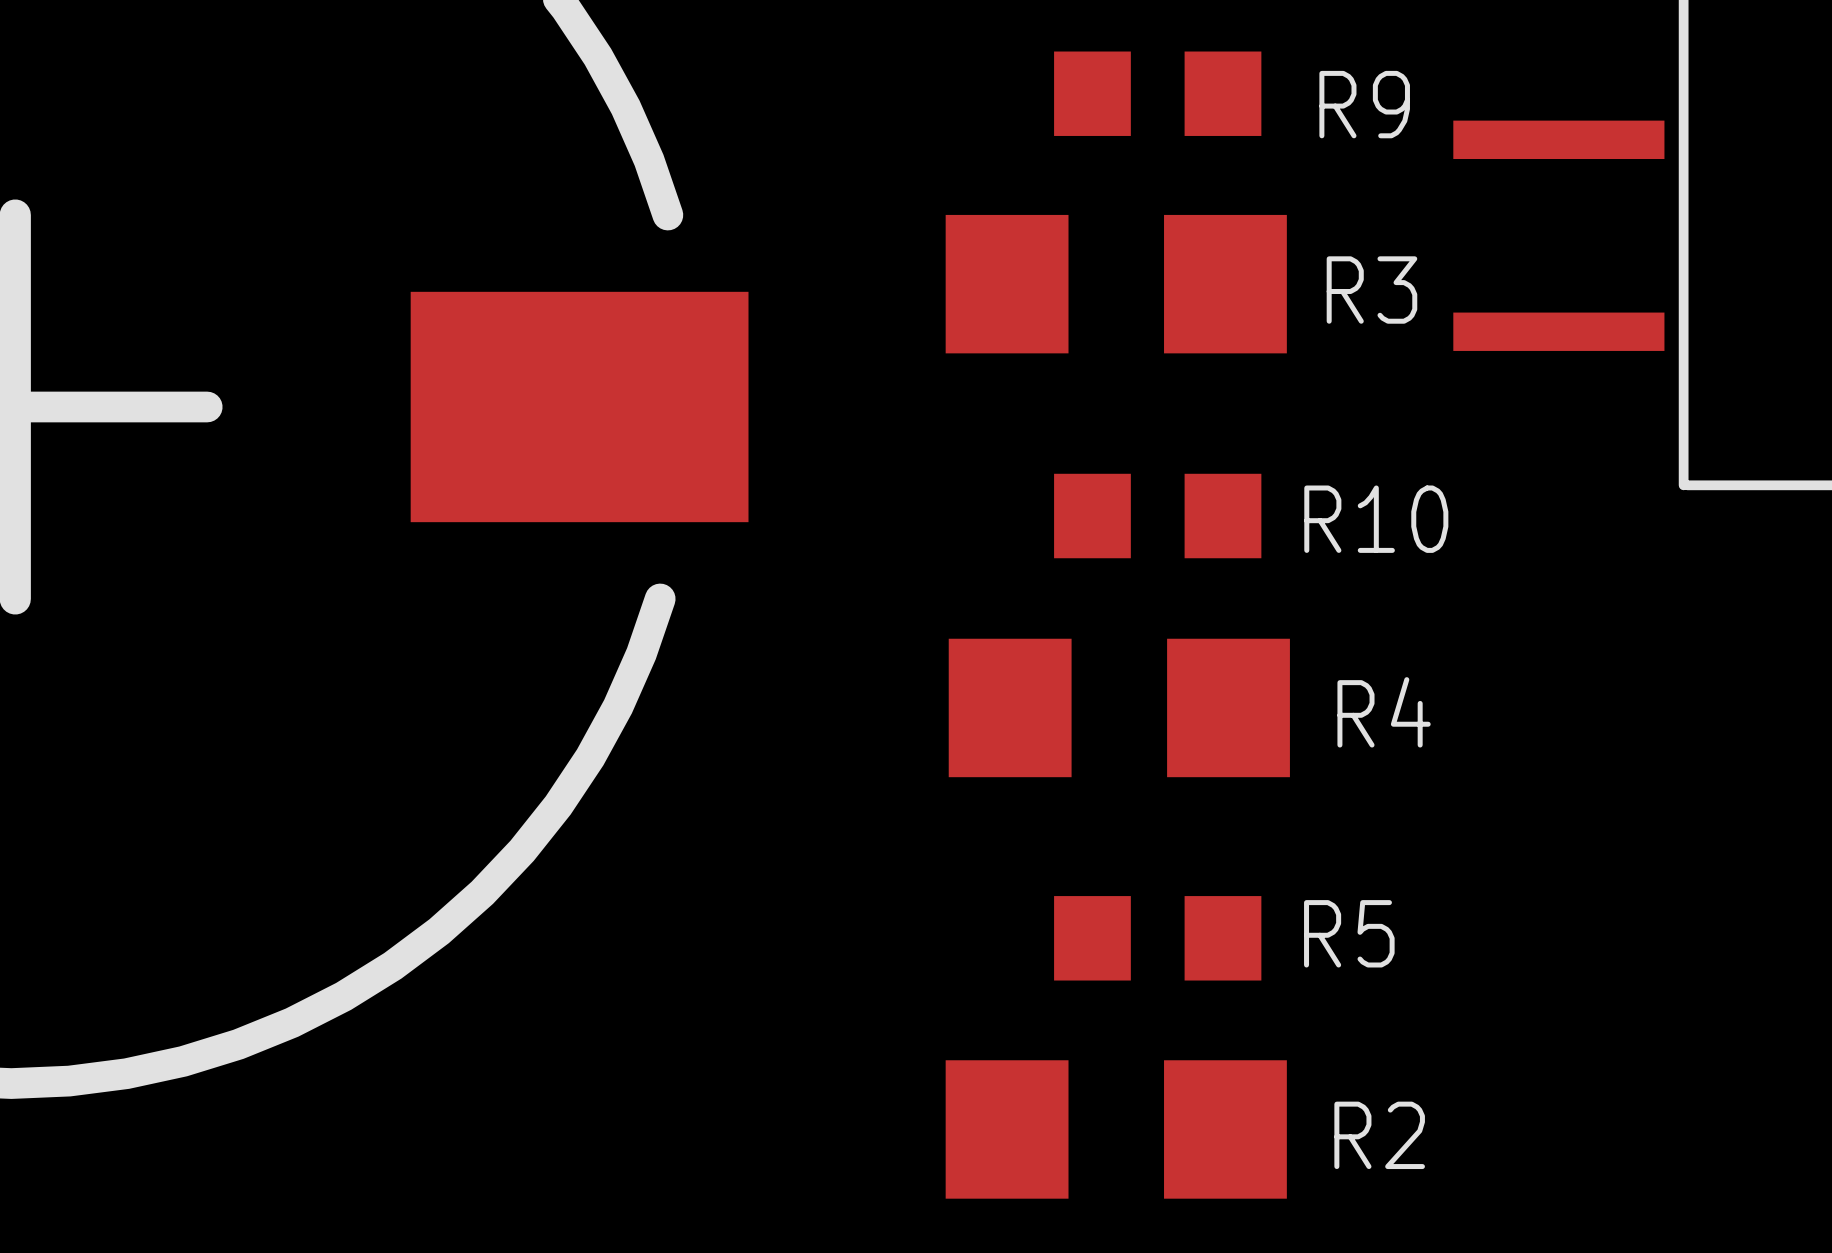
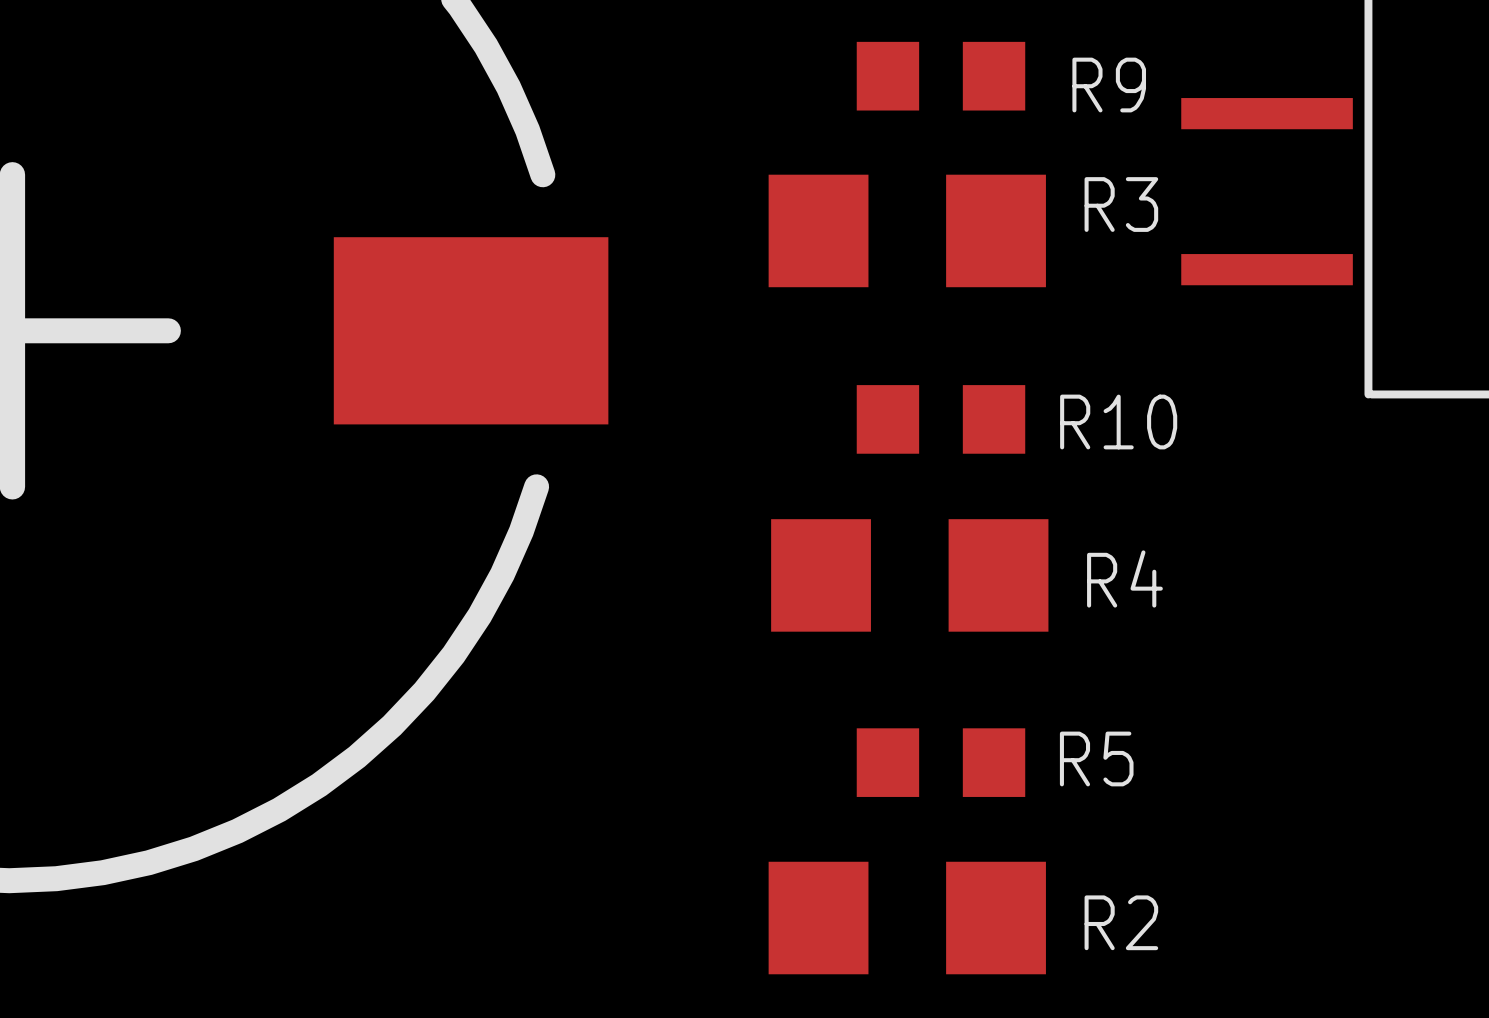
R3 name position: R3 (1371, 290) -> R3 (1121, 204)

